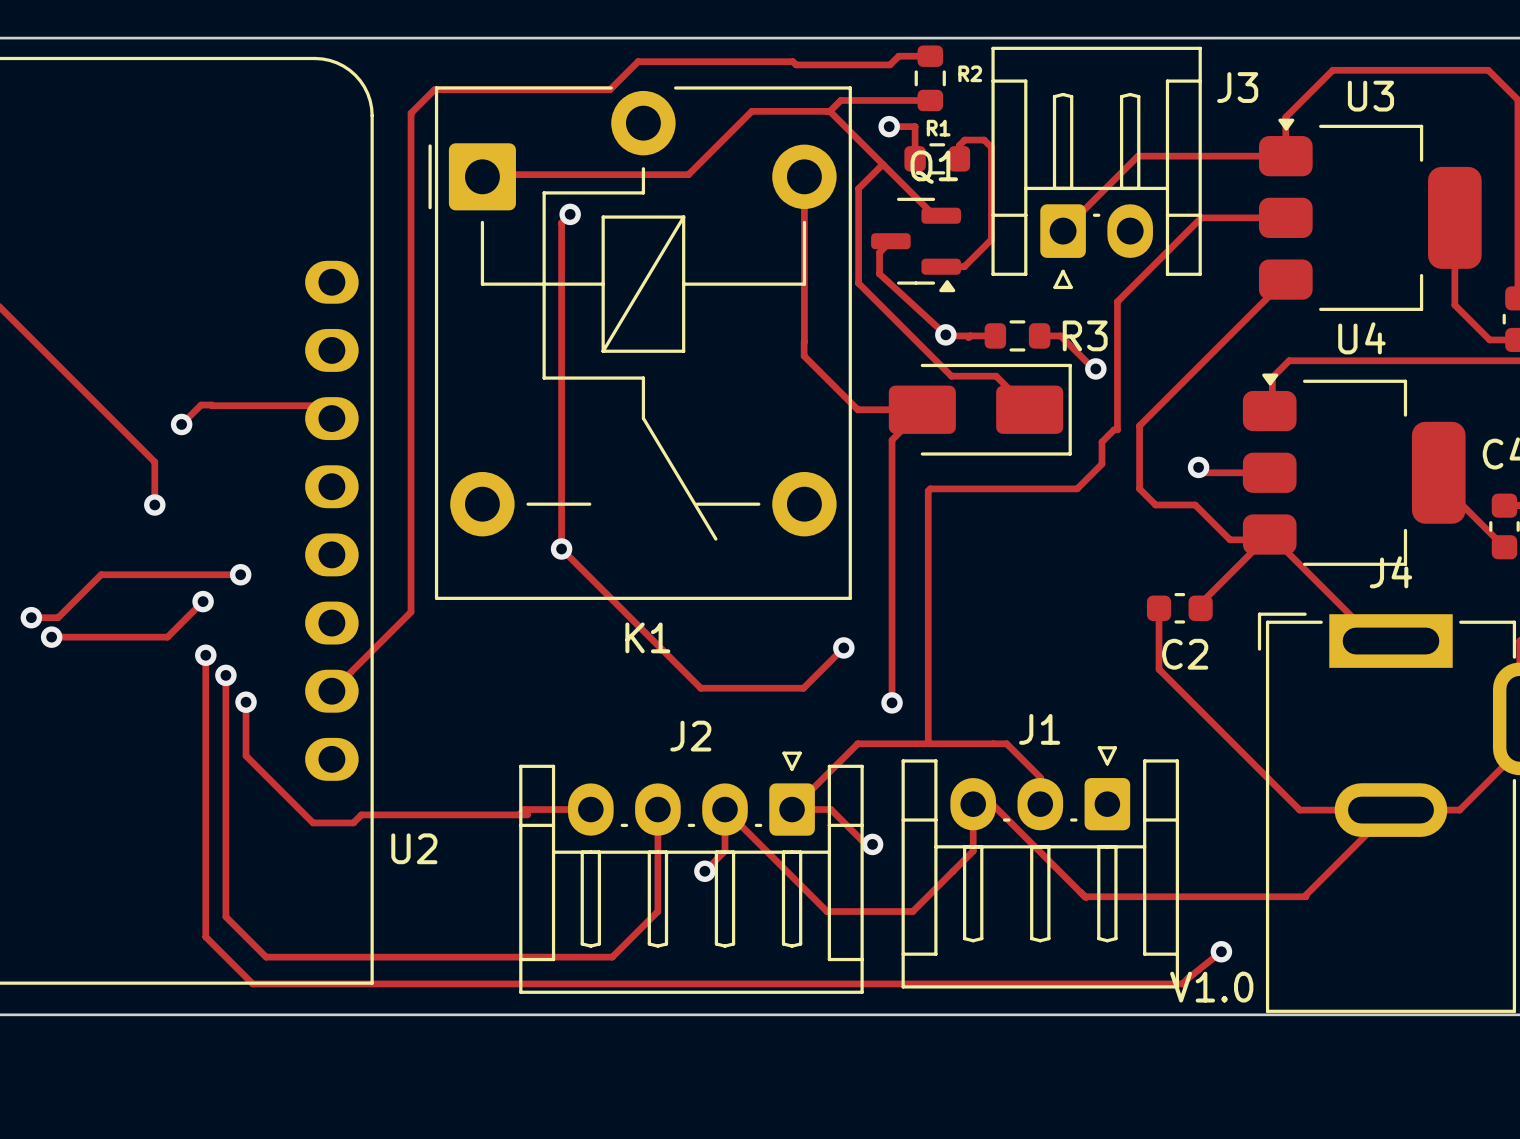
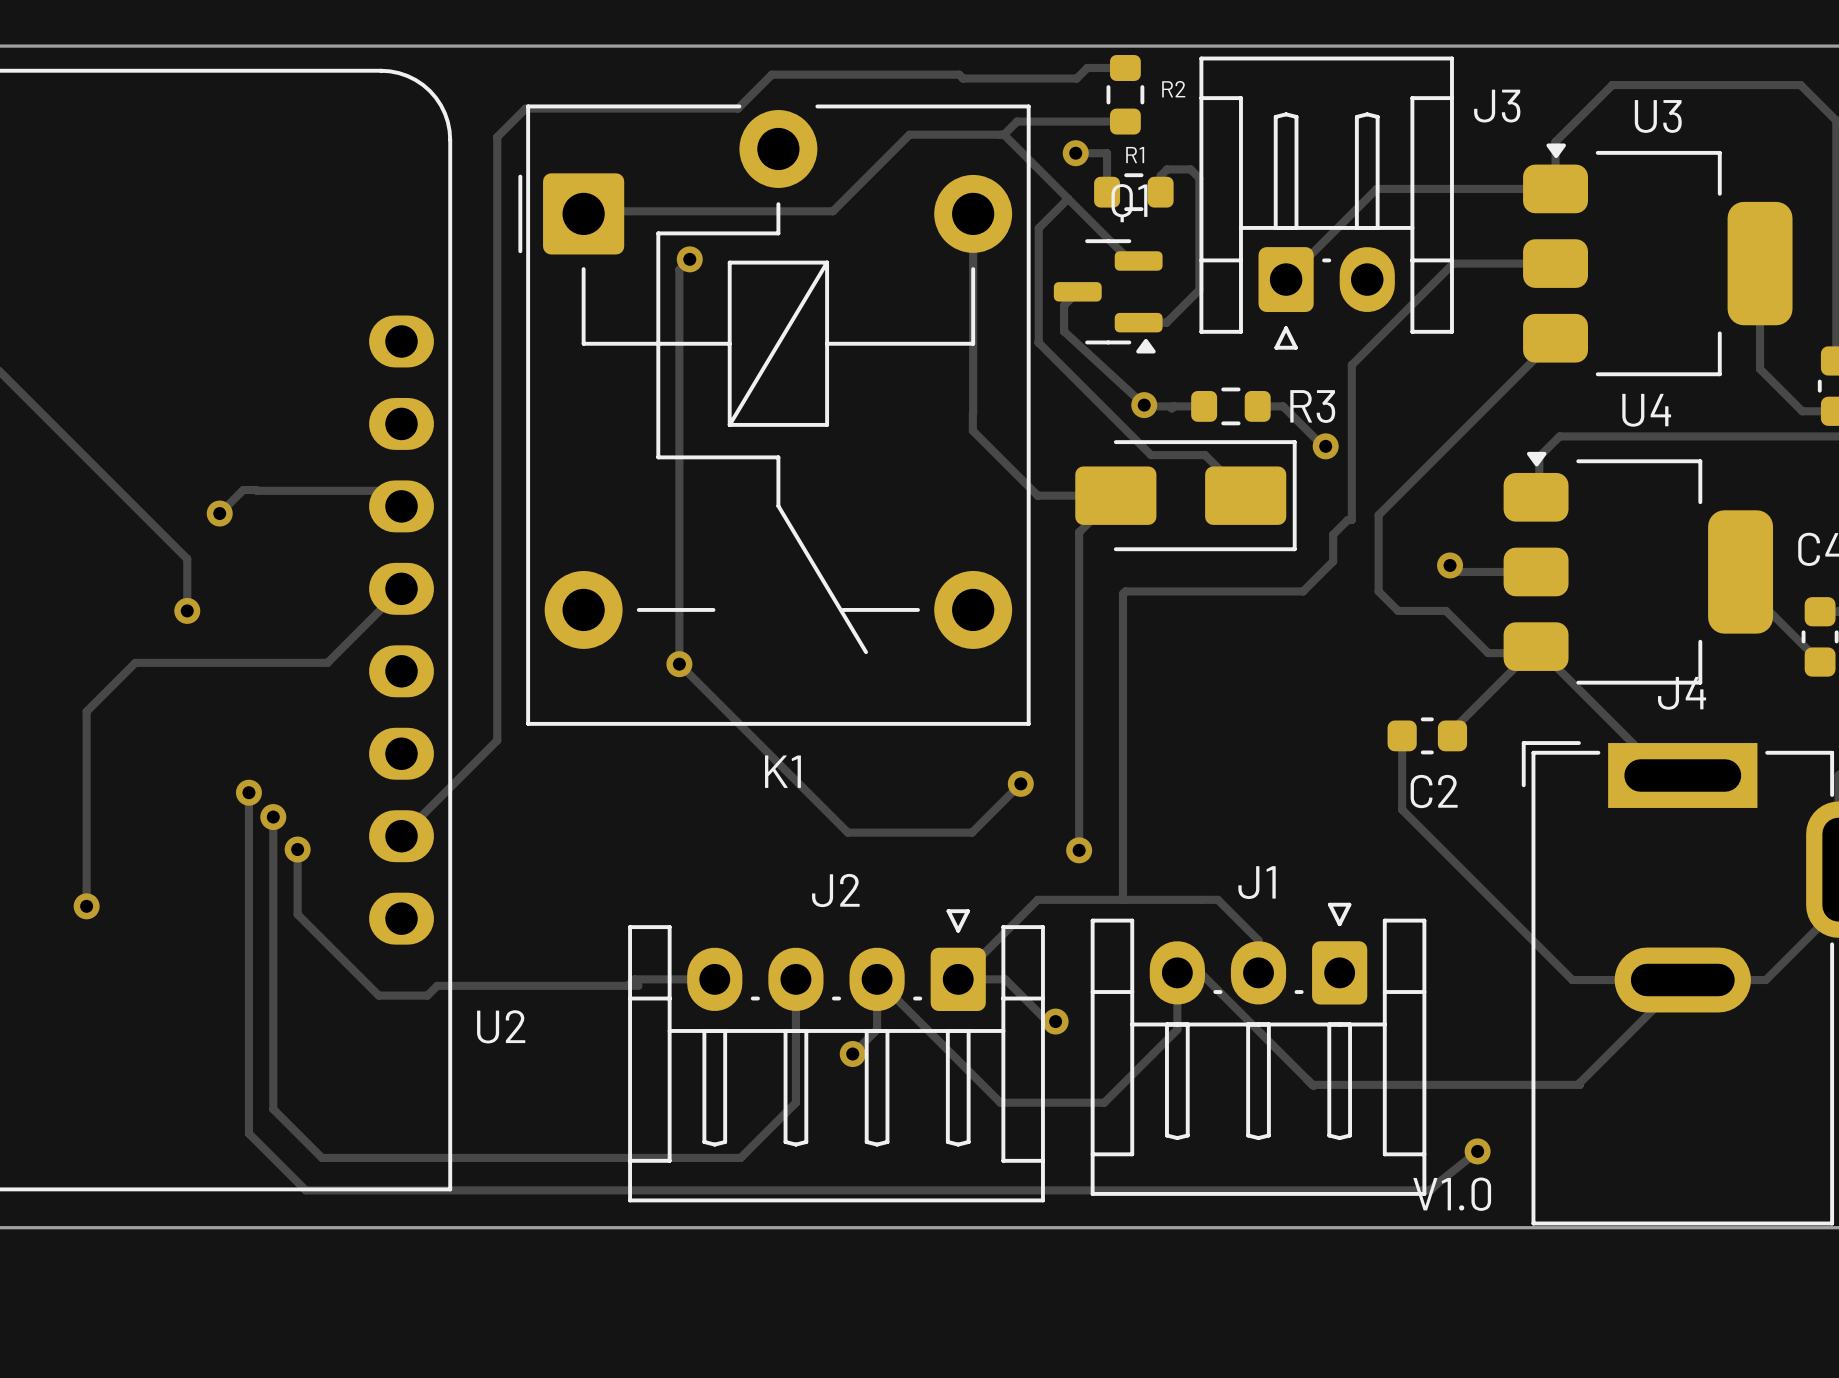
track: none -> (401, 588) (327, 662) (135, 662) (86, 711) (86, 906)
track: (240, 574) (101, 574) (58, 617) (31, 617) -> none
via: (240, 574) -> none
track: (203, 601) (167, 637) (51, 637) -> none
via: (203, 601) -> none
via: (31, 617) -> none
via: (51, 637) -> none
via: none -> (86, 906)

